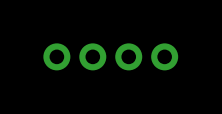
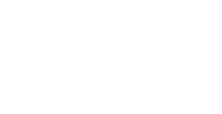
part: (110, 56) -> none

